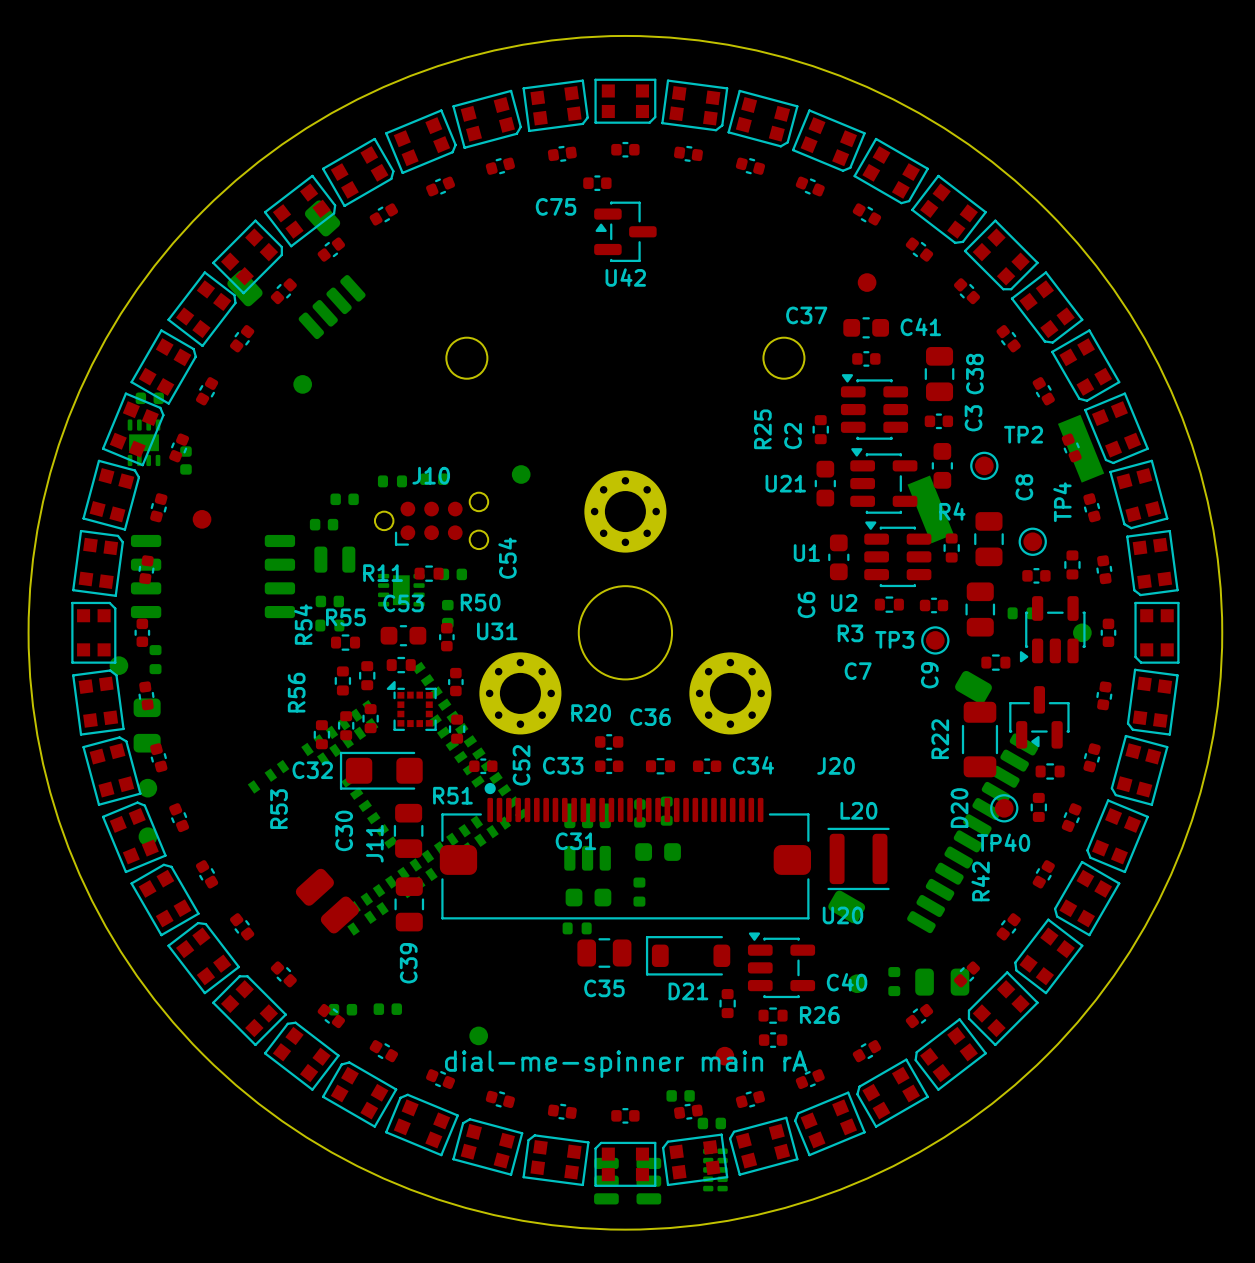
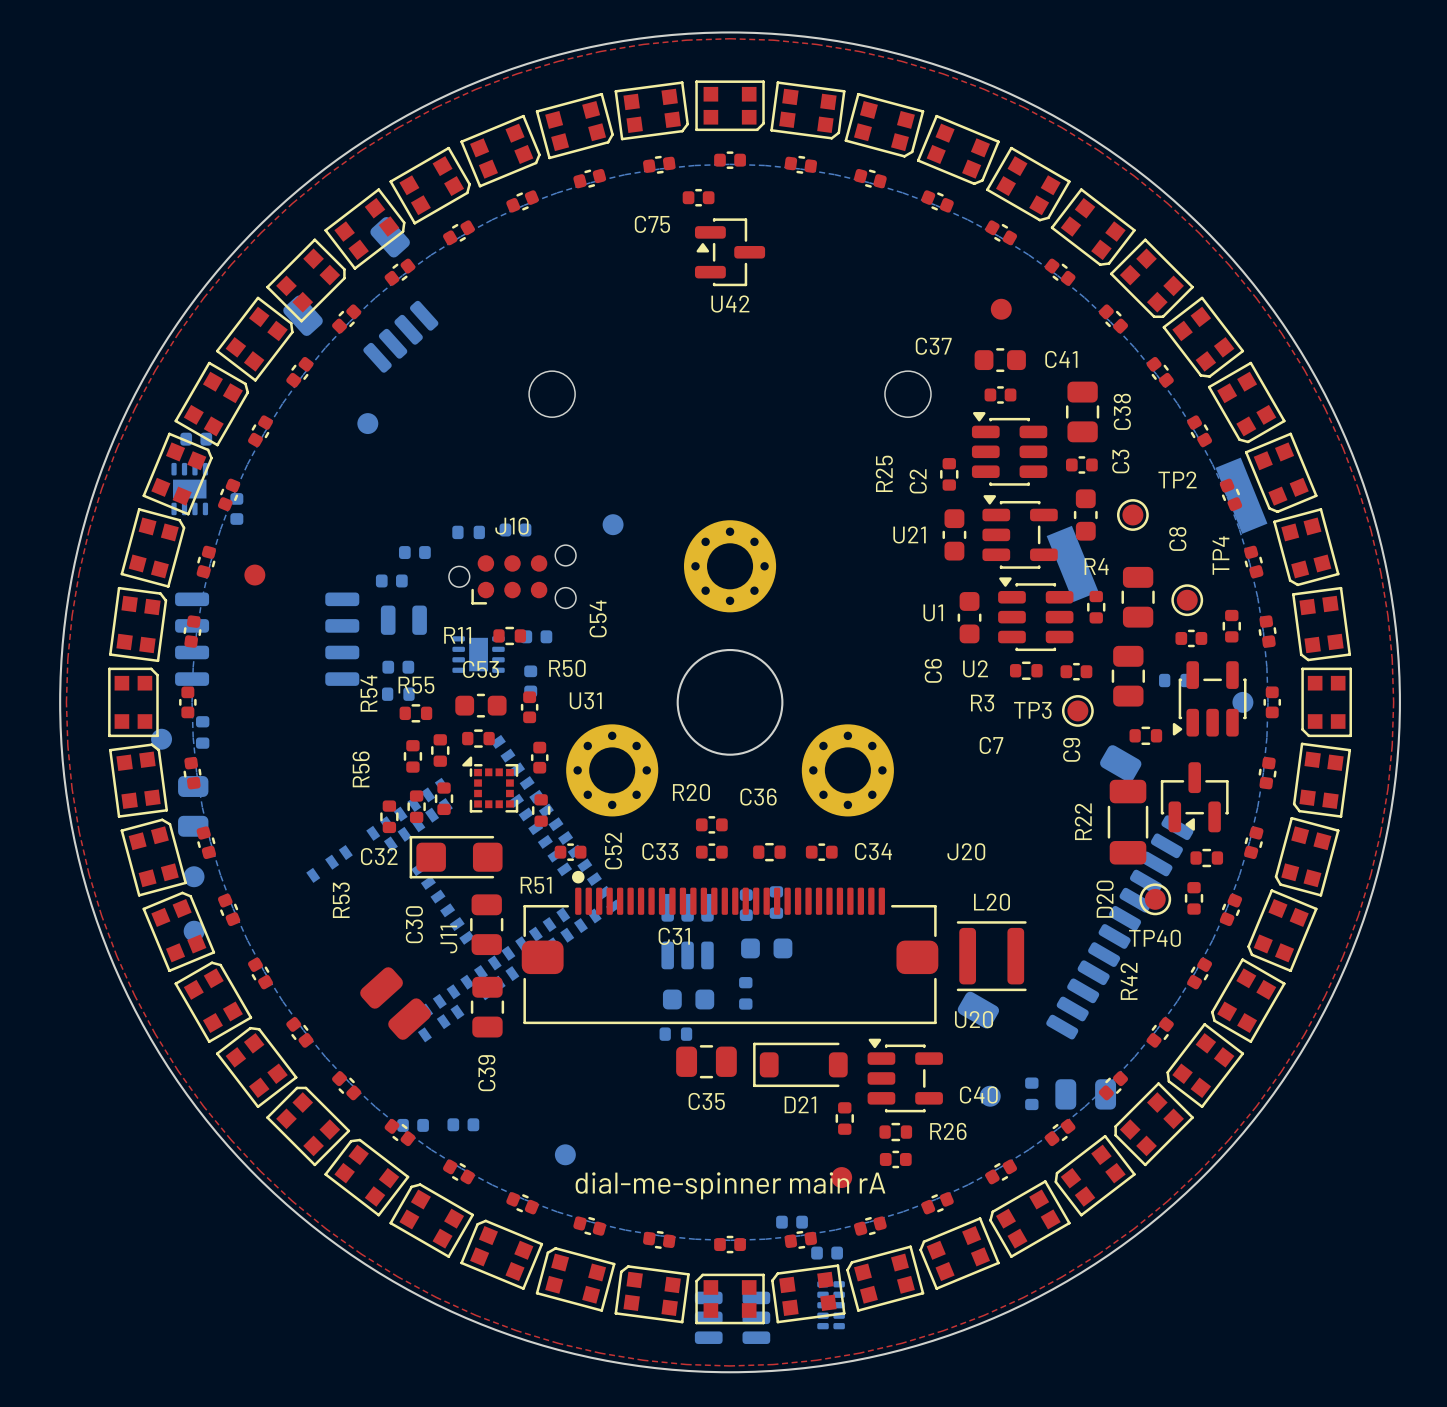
top zone outline: none -> (730, 38) (643, 44) (600, 51) (516, 73) (476, 89) (398, 127) (361, 150) (292, 203) (260, 233) (231, 264) (178, 333) (155, 370) (116, 448) (101, 489) (79, 572) (72, 615) (66, 702) (72, 788) (79, 831) (101, 915) (116, 956) (155, 1034) (178, 1071) (231, 1139) (260, 1171) (292, 1201) (361, 1254) (398, 1277) (476, 1315) (516, 1330) (600, 1353) (643, 1360) (730, 1365) (816, 1360) (859, 1353) (943, 1330) (983, 1315) (1061, 1277) (1098, 1254) (1167, 1201) (1199, 1171) (1228, 1139) (1281, 1071) (1304, 1034) (1343, 956) (1358, 915) (1380, 831) (1387, 788) (1393, 702) (1387, 615) (1380, 572) (1358, 489) (1343, 448) (1304, 370) (1281, 333) (1228, 264) (1199, 233) (1167, 203) (1098, 150) (1061, 127) (983, 89) (943, 73) (859, 51) (816, 44) (730, 38)
bottom zone outline: none -> (730, 164) (694, 165) (625, 174) (557, 192) (524, 205) (492, 219) (431, 255) (375, 297) (349, 321) (325, 347) (282, 403) (247, 464) (232, 496) (220, 529) (202, 597) (193, 667) (192, 702) (193, 737) (202, 807) (220, 875) (232, 908) (247, 940) (282, 1001) (325, 1057) (349, 1082) (375, 1106) (431, 1149) (492, 1184) (524, 1199) (557, 1211) (625, 1230) (694, 1239) (730, 1240) (765, 1239) (835, 1230) (902, 1211) (935, 1199) (967, 1184) (1028, 1149) (1084, 1106) (1110, 1082) (1134, 1057) (1177, 1001) (1212, 940) (1227, 908) (1239, 875) (1257, 807) (1266, 737) (1268, 702) (1266, 667) (1257, 597) (1239, 529) (1227, 496) (1212, 464) (1177, 403) (1134, 347) (1110, 321) (1084, 297) (1028, 255) (967, 219) (935, 205) (902, 192) (835, 174) (765, 165) (730, 164)

